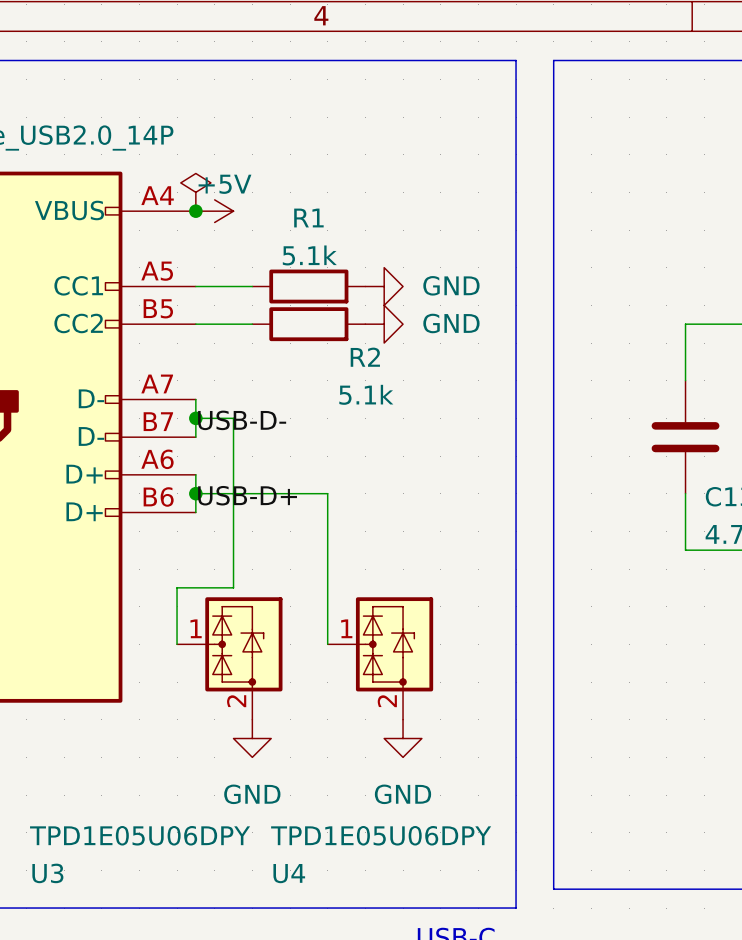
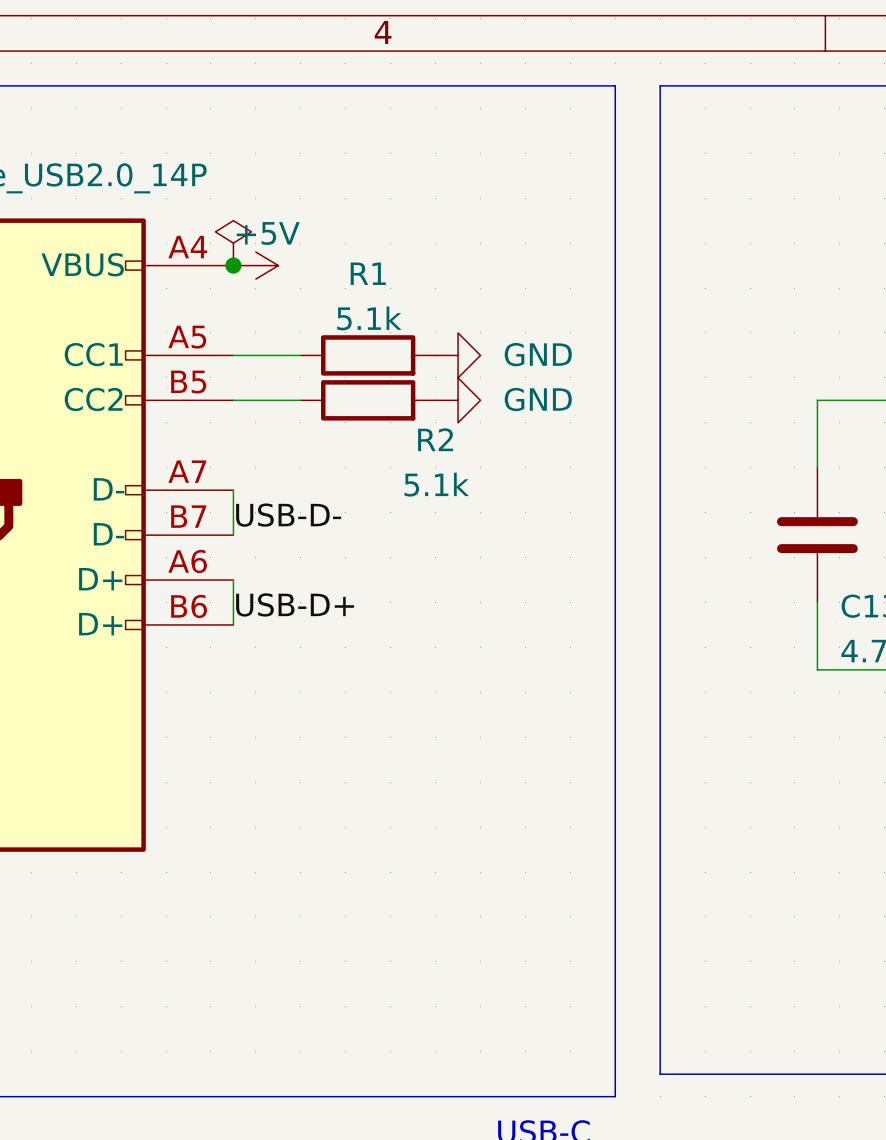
wire: (195, 418) (233, 418) (233, 587) (177, 587) (177, 644) -> none
junction: (195, 418) -> none
wire: (195, 493) (327, 493) (327, 644) -> none
junction: (195, 493) -> none
U3: TPD1E05U06DPY (229, 658) -> none
U4: TPD1E05U06DPY (380, 658) -> none
power symbol: GND (252, 738) -> none
power symbol: GND (403, 738) -> none

